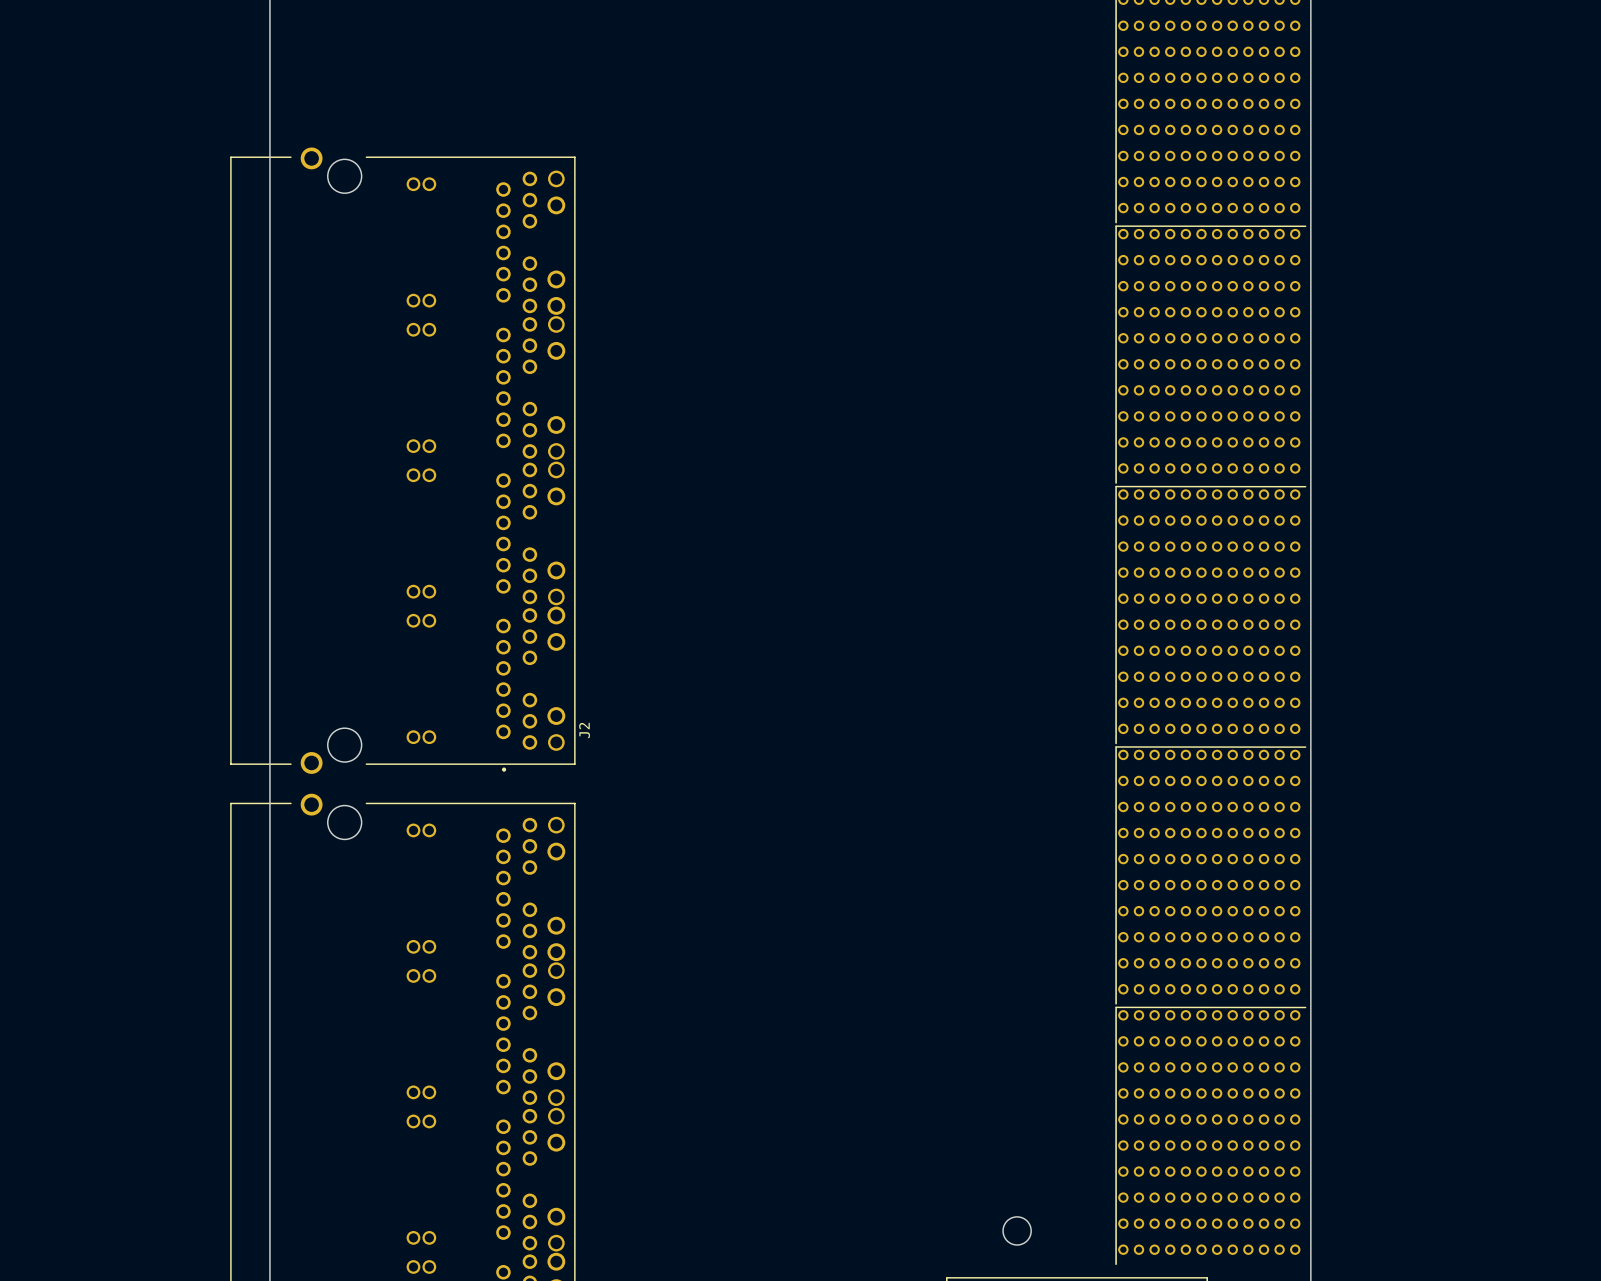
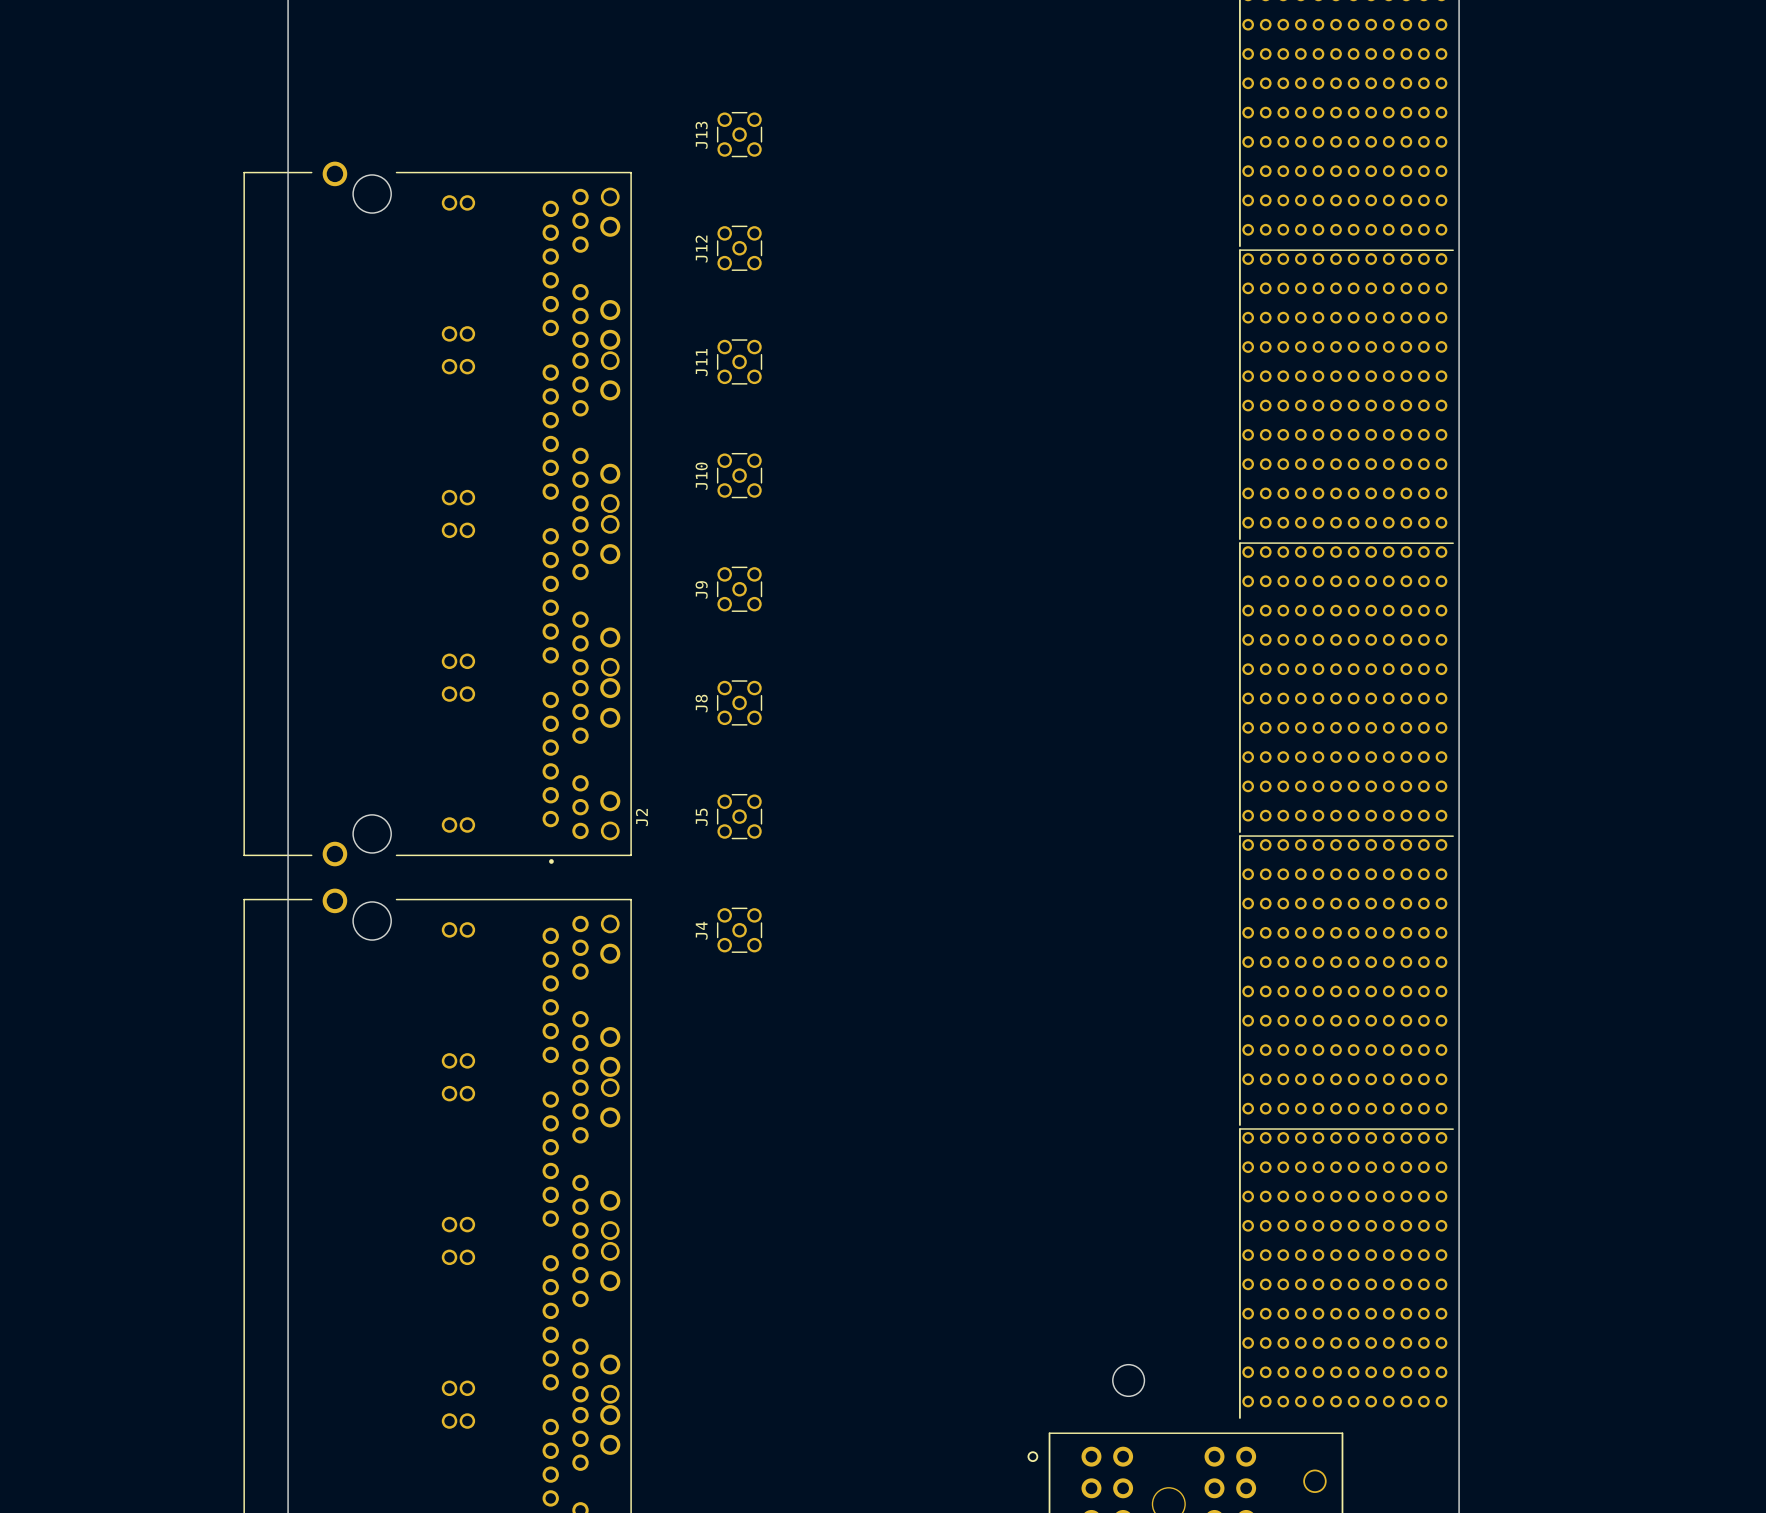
J13: none -> (739, 134)
J12: none -> (739, 248)
J11: none -> (739, 361)
J10: none -> (739, 475)
J9: none -> (739, 589)
J8: none -> (739, 702)
J5: none -> (739, 816)
J4: none -> (739, 930)

